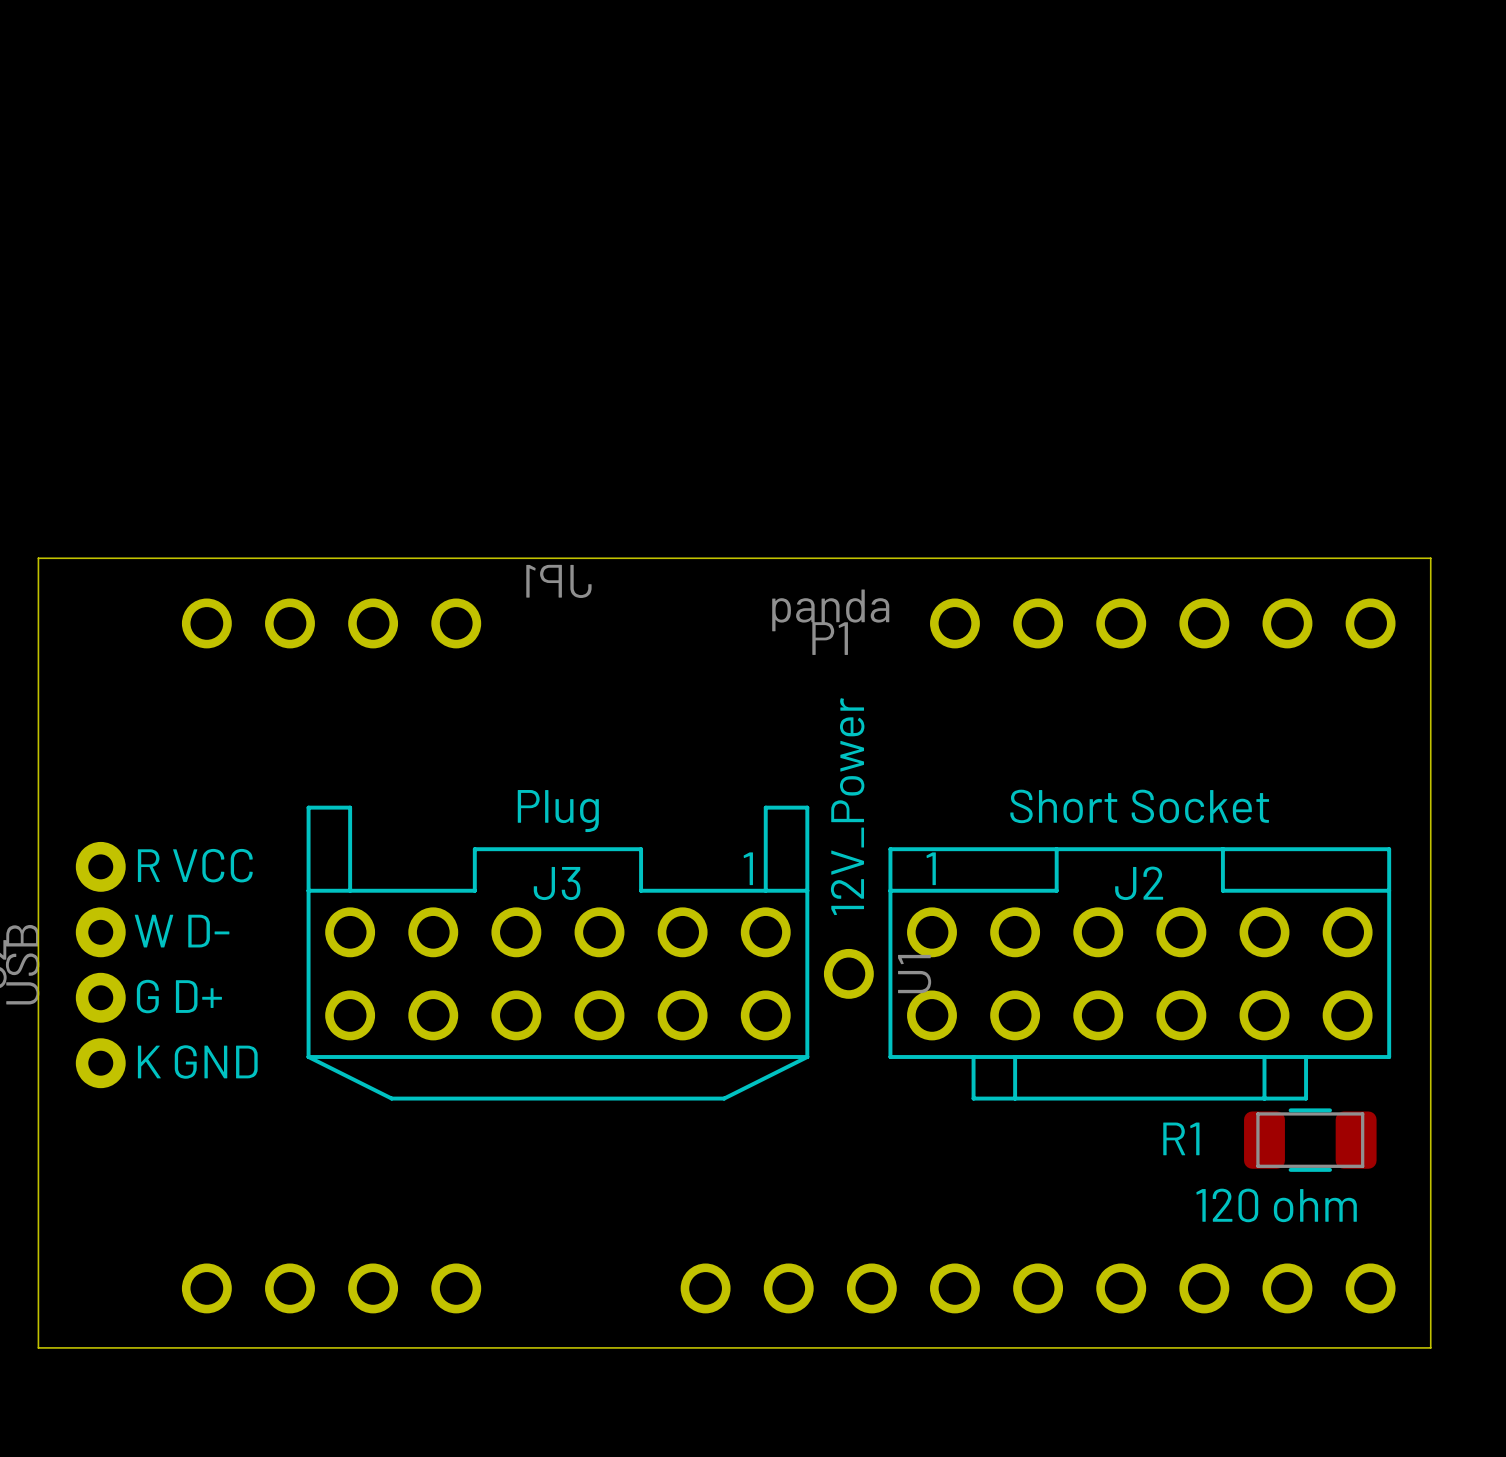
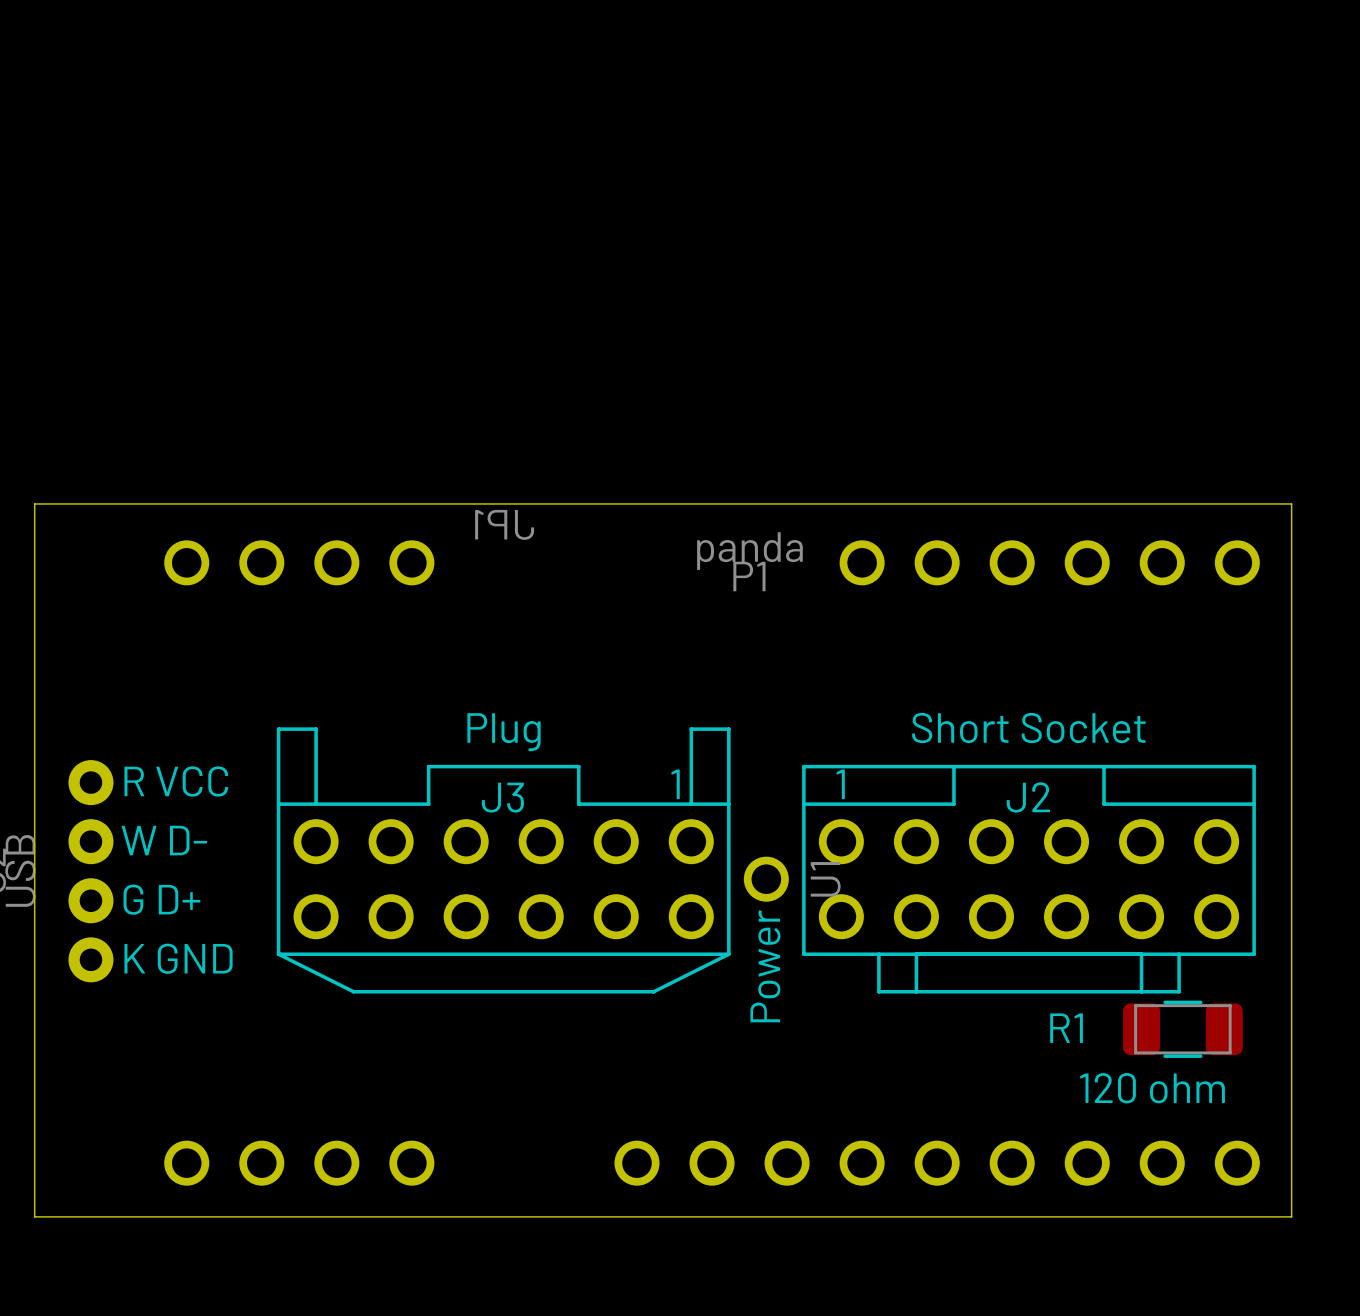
U1 value: 12V_Power (847, 806) -> Power (765, 966)

